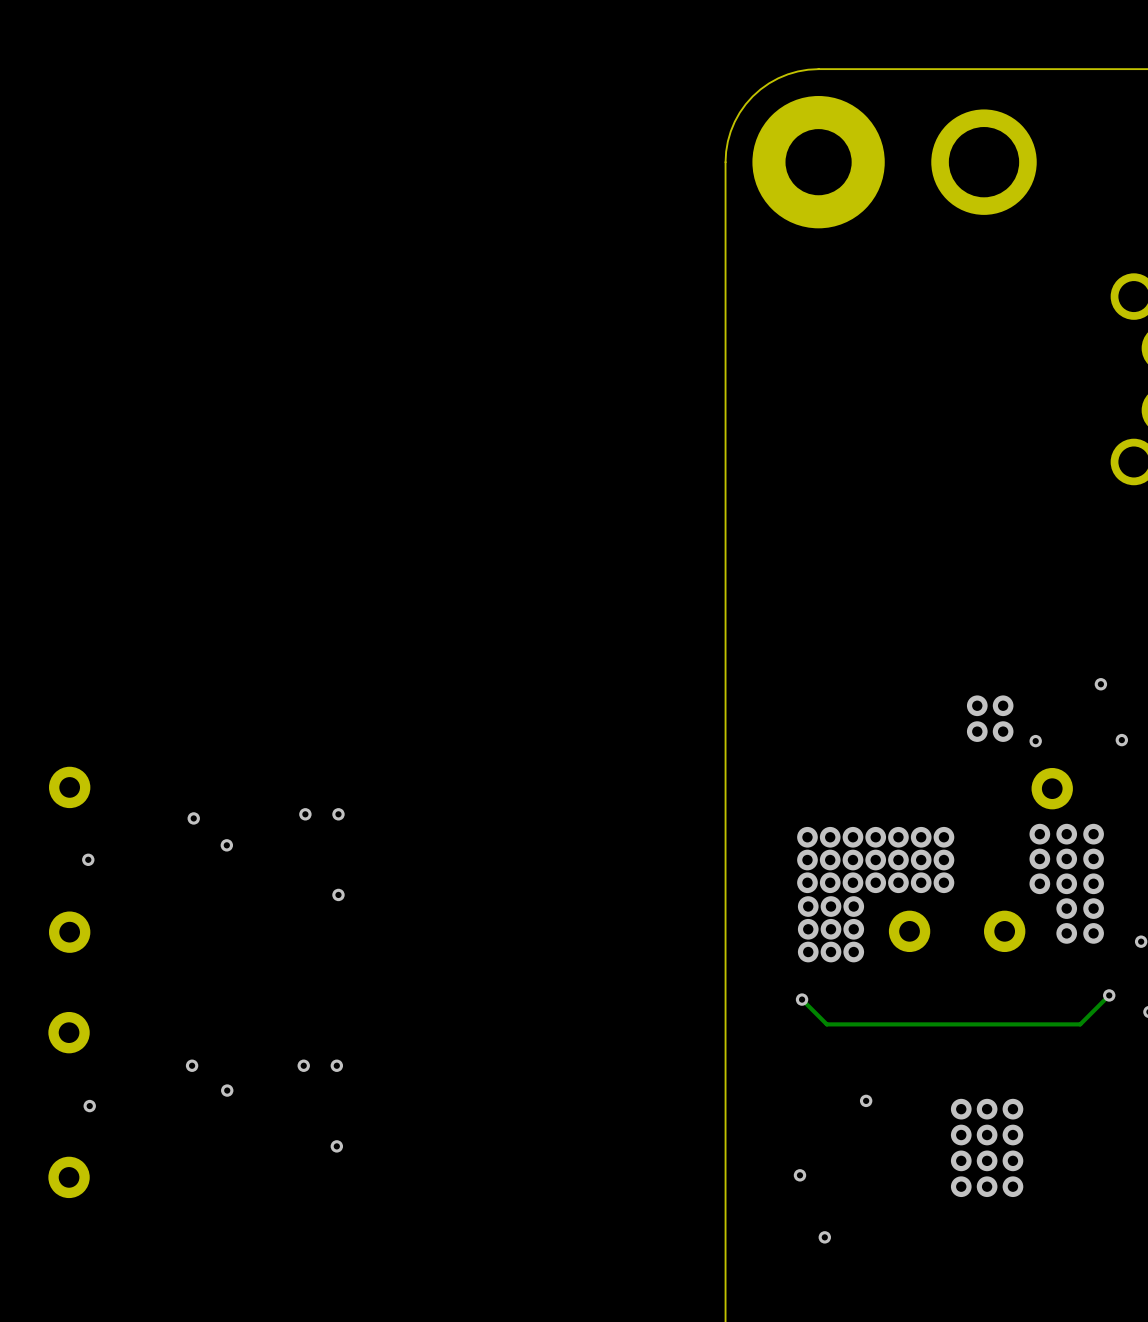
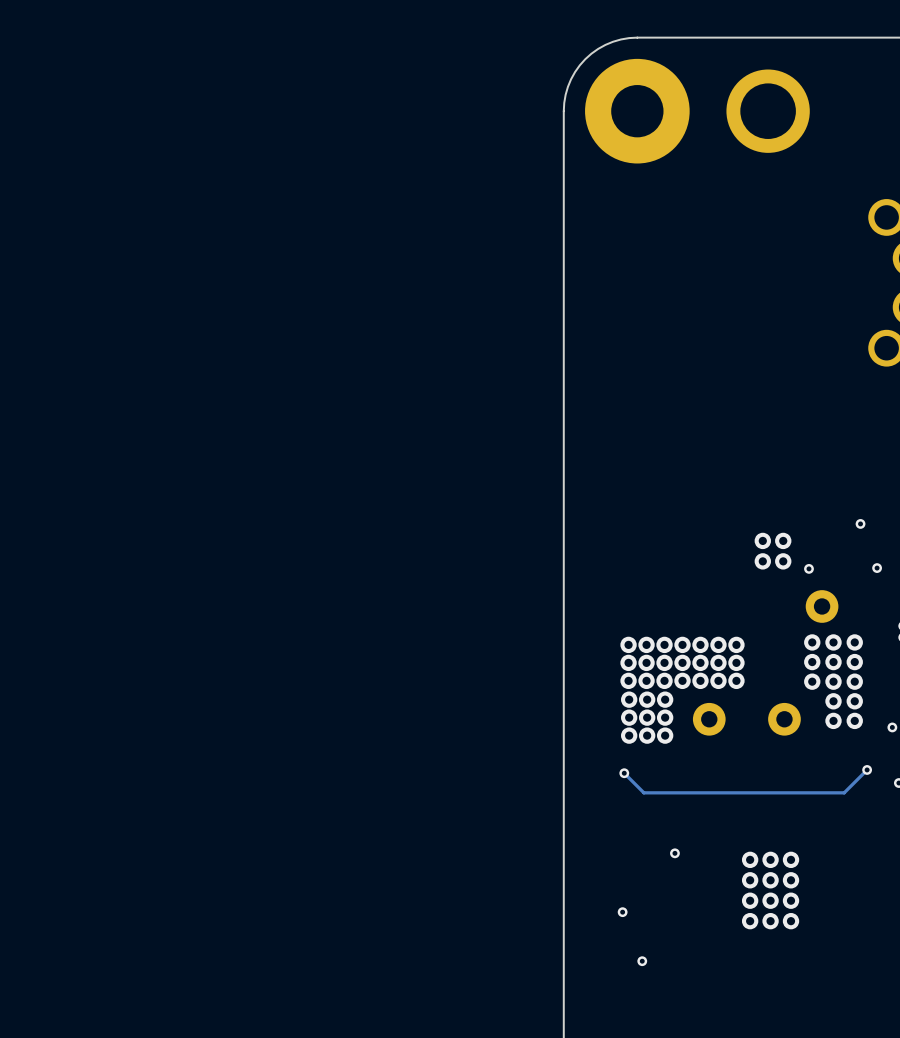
part: (69, 787) -> none
via: (305, 814) -> none
via: (338, 814) -> none
via: (193, 818) -> none
via: (226, 845) -> none
via: (88, 859) -> none
via: (338, 894) -> none
part: (69, 932) -> none
part: (69, 1032) -> none
via: (192, 1065) -> none
via: (303, 1065) -> none
via: (336, 1065) -> none
via: (227, 1090) -> none
via: (89, 1106) -> none
via: (336, 1146) -> none
part: (69, 1177) -> none

